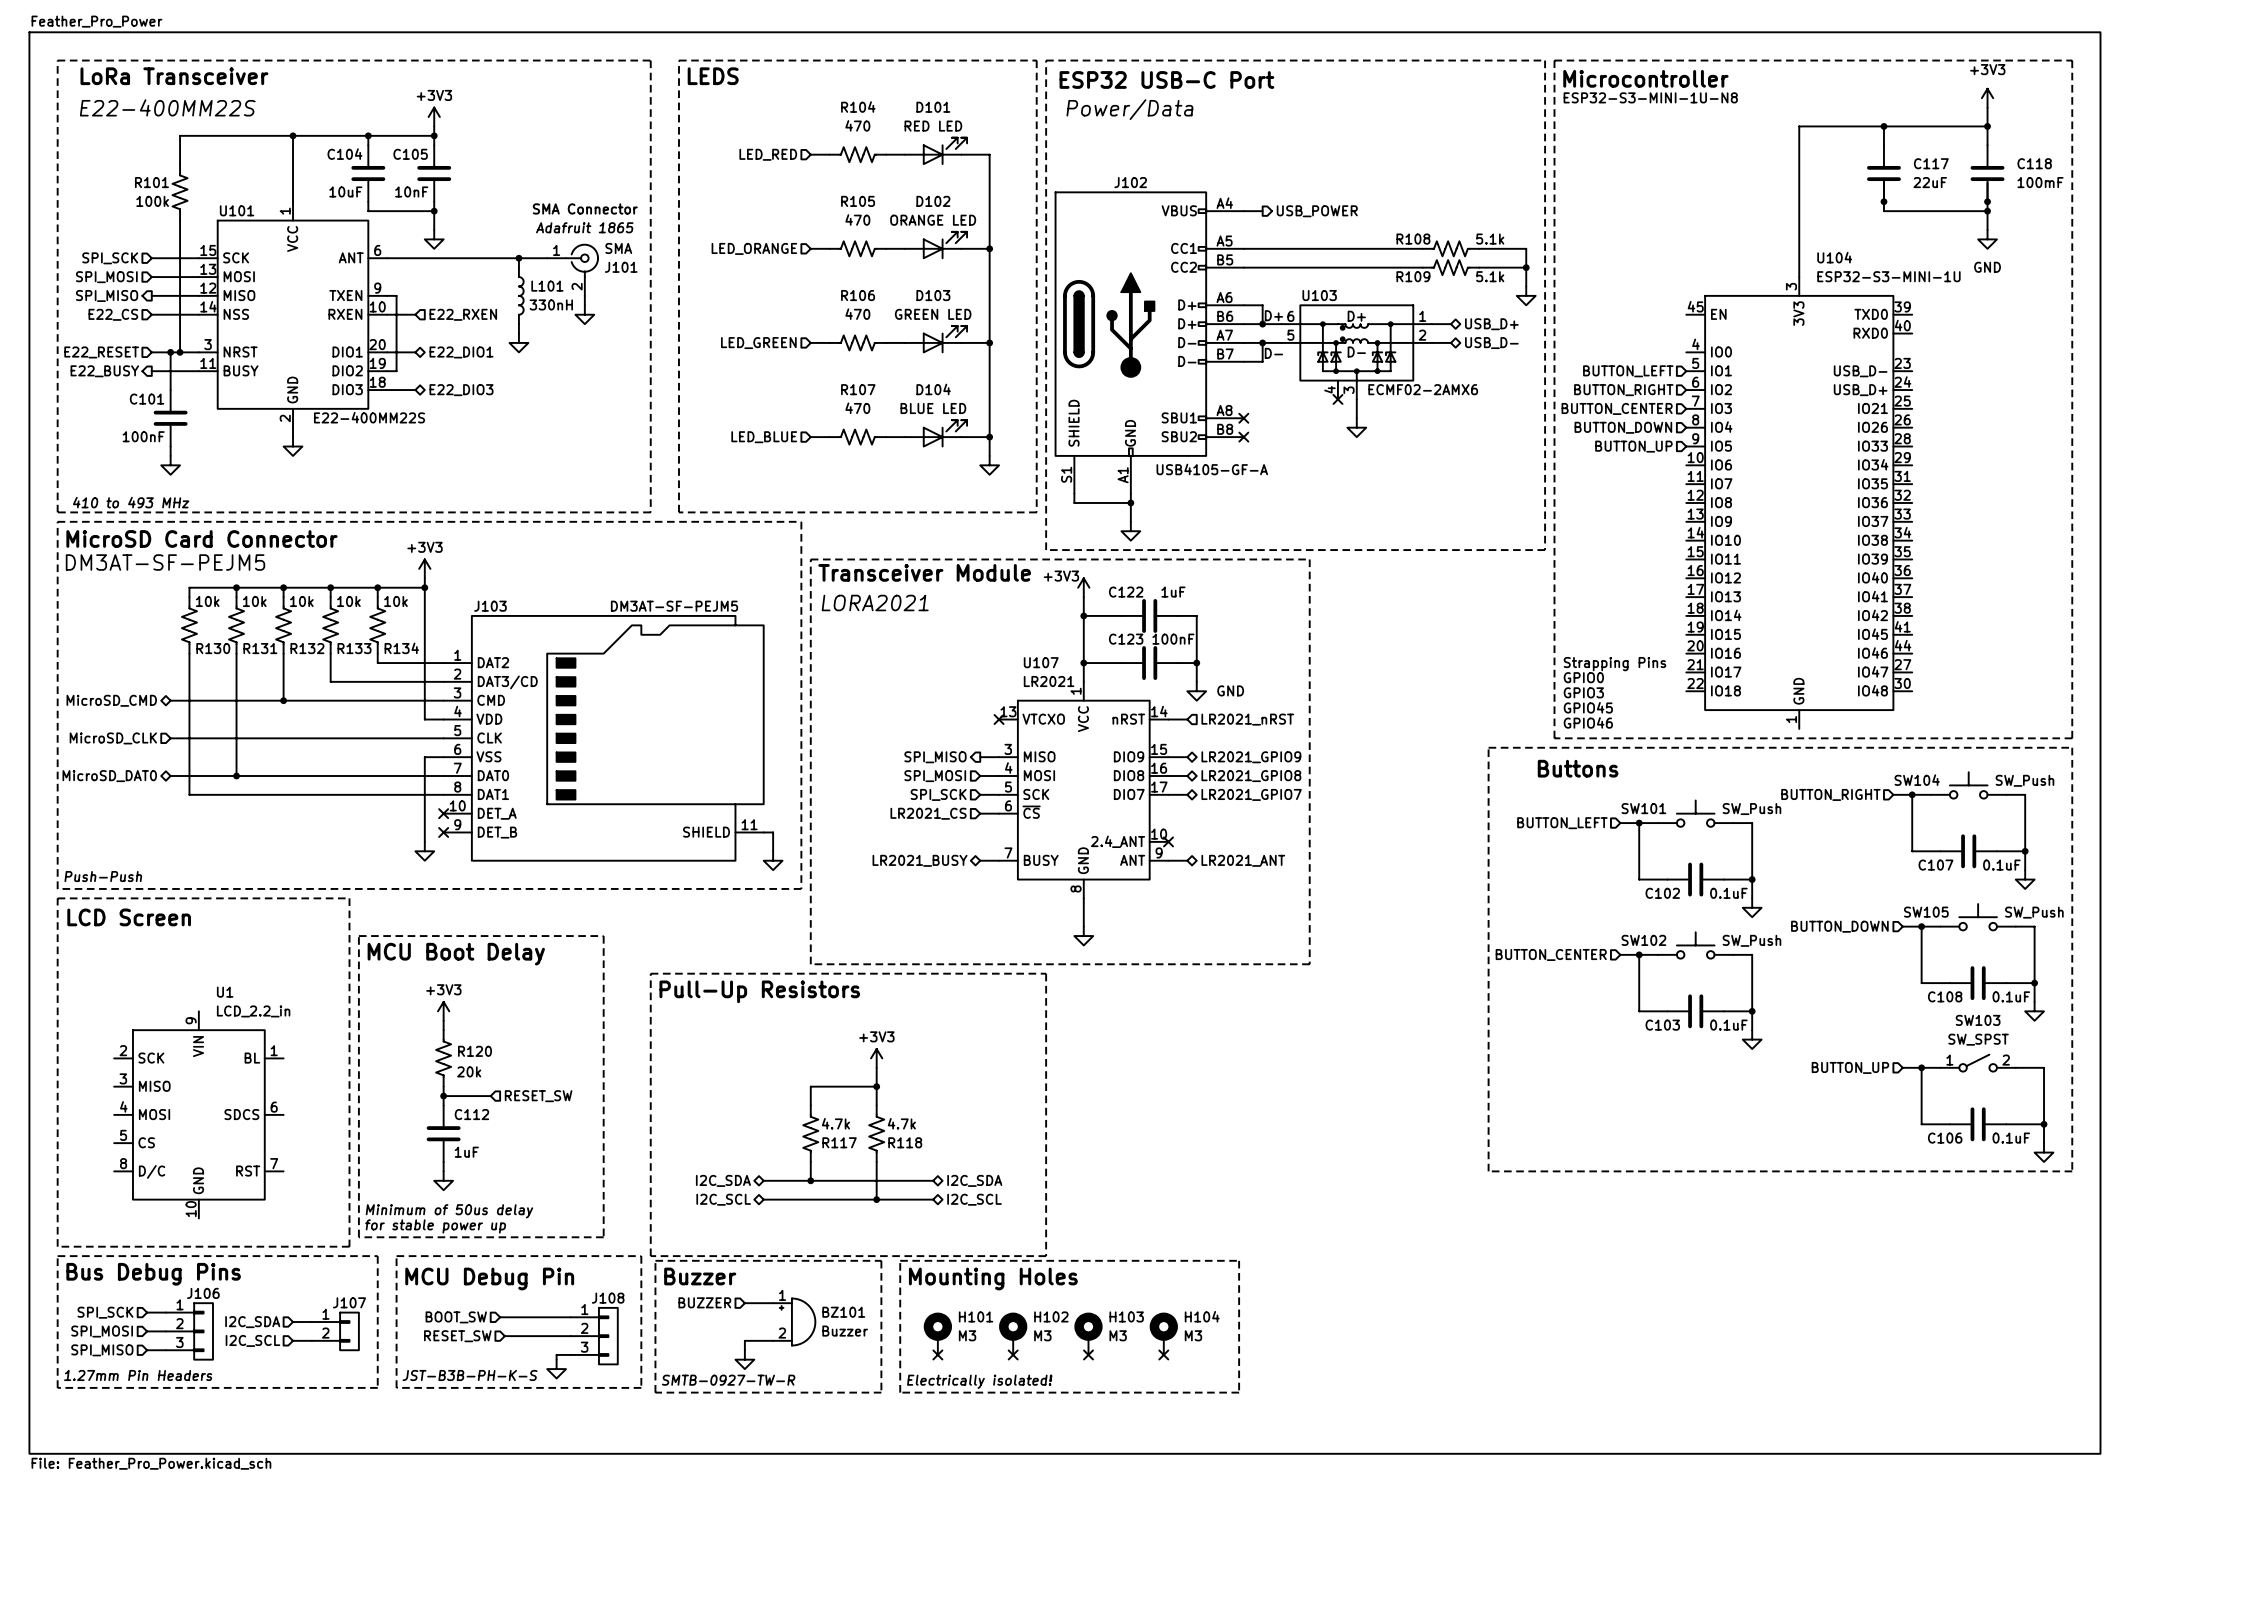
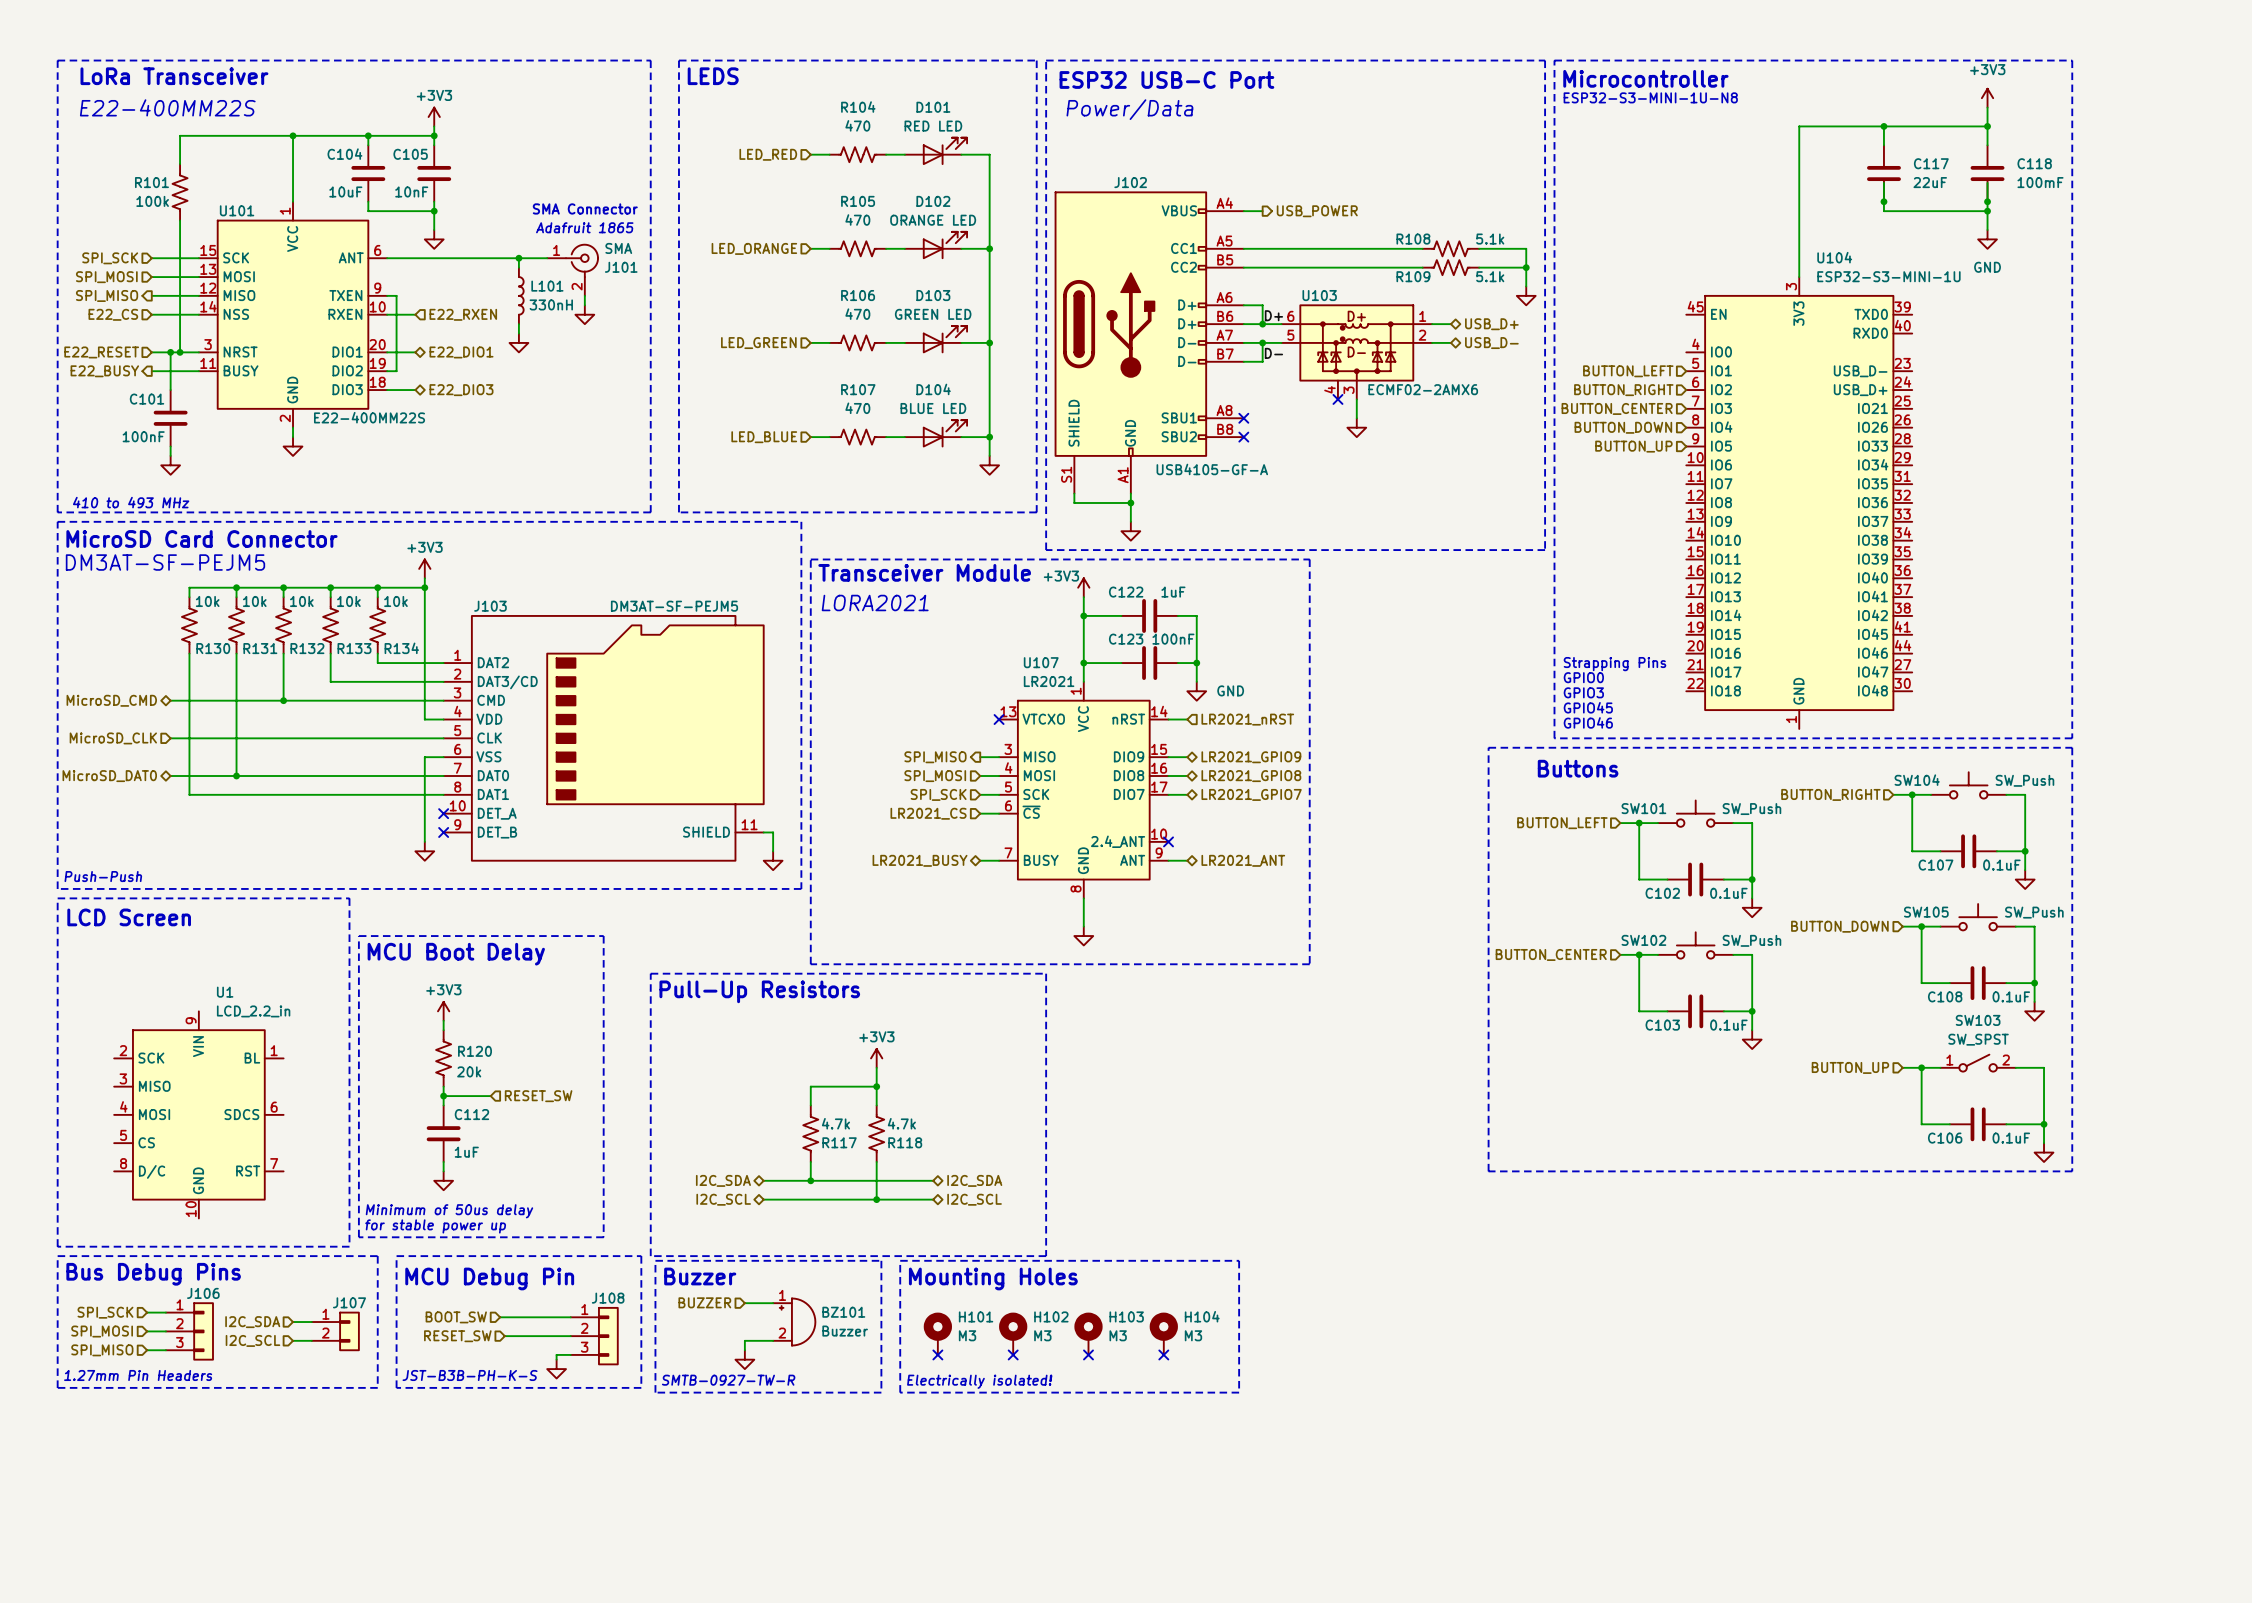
sheet Feather_Pro_Power: File: Feather_Pro_Power.kicad_sch (1064, 743) -> none

